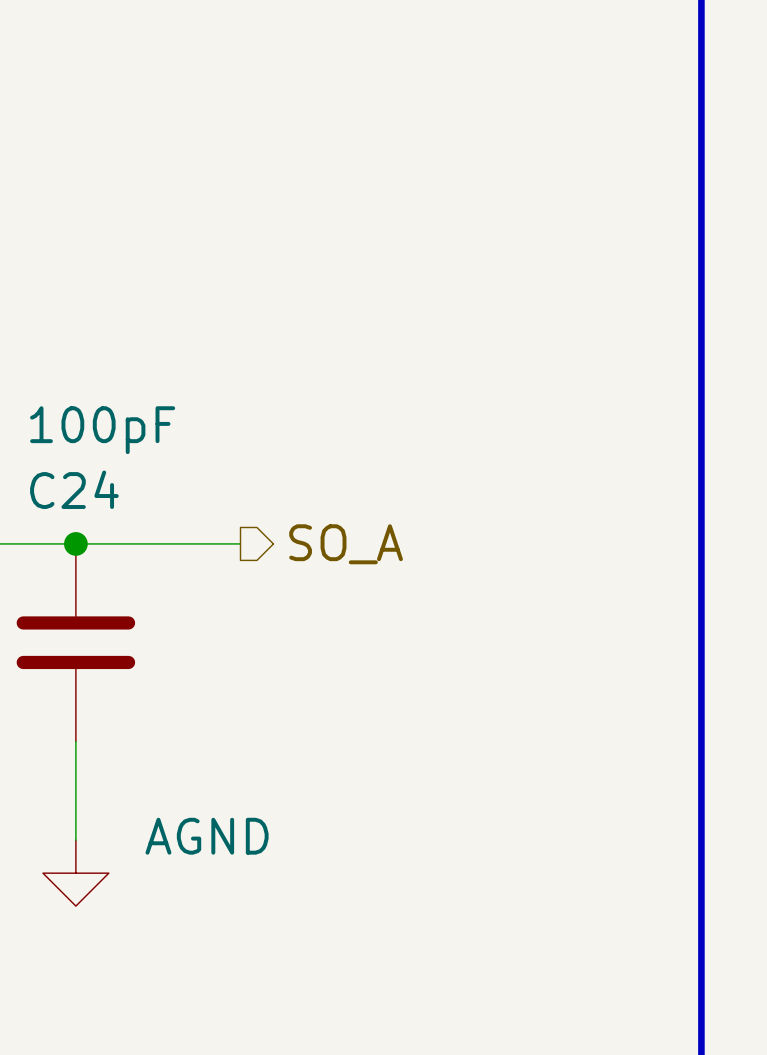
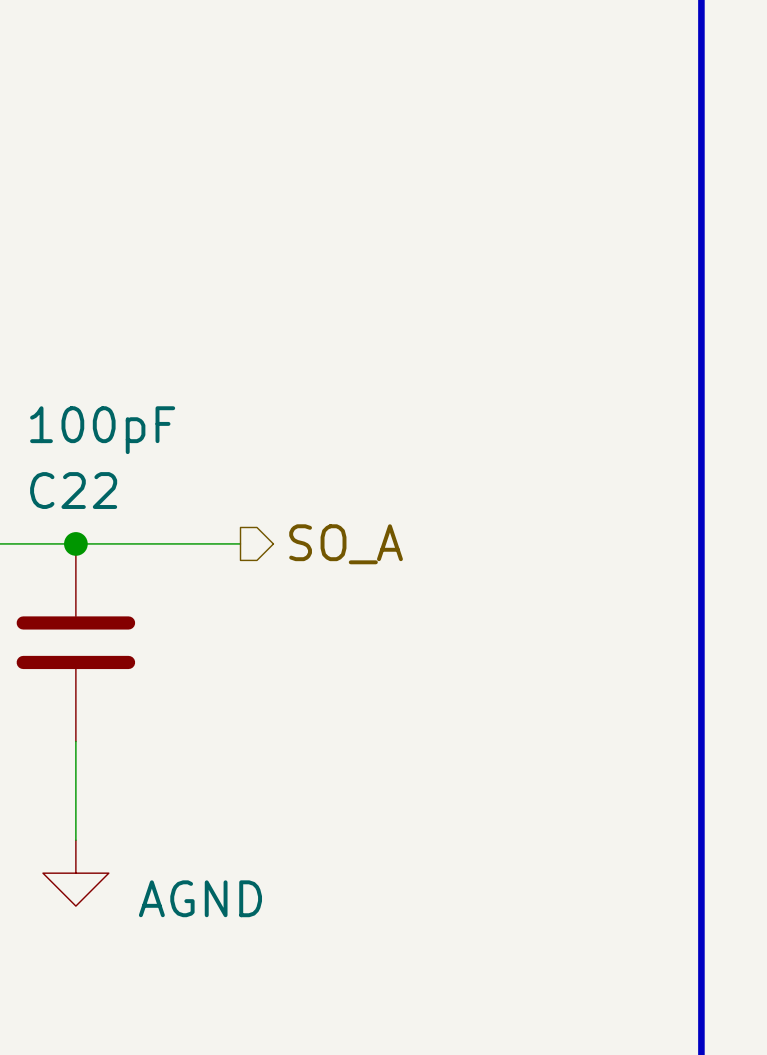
C24 name: C24 (74, 489) -> C22 (73, 490)
power symbol text position: AGND (207, 836) -> AGND (200, 898)

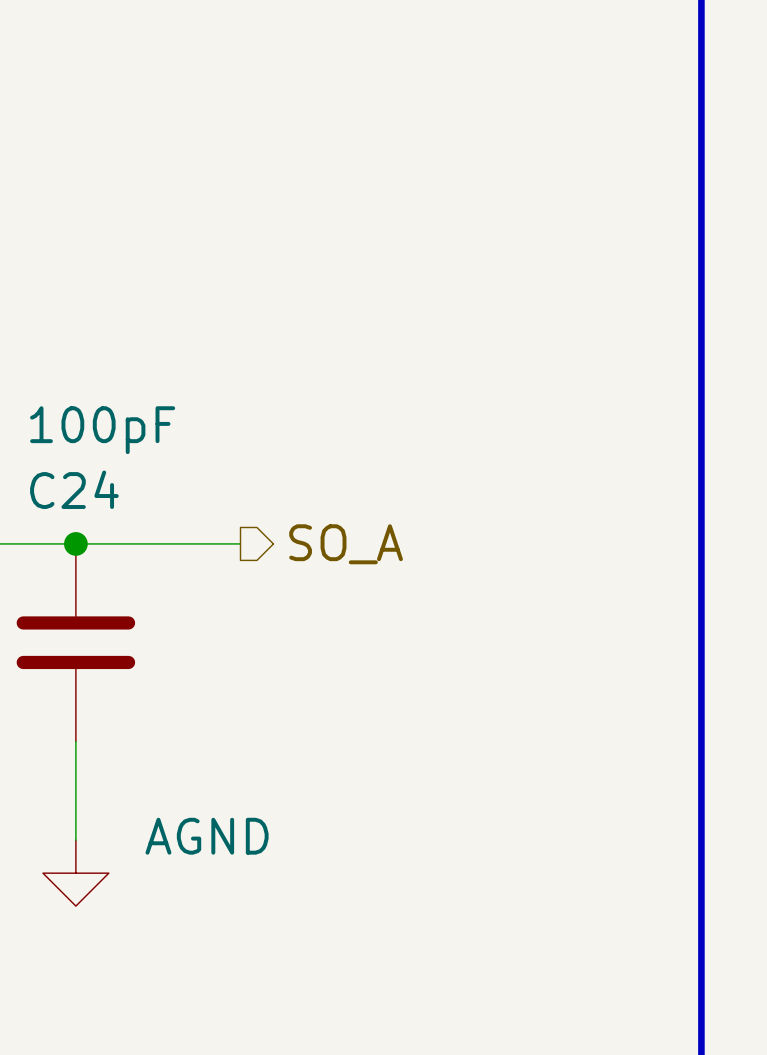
C22 name: C22 (73, 490) -> C24 (74, 489)
power symbol text position: AGND (200, 898) -> AGND (207, 836)

